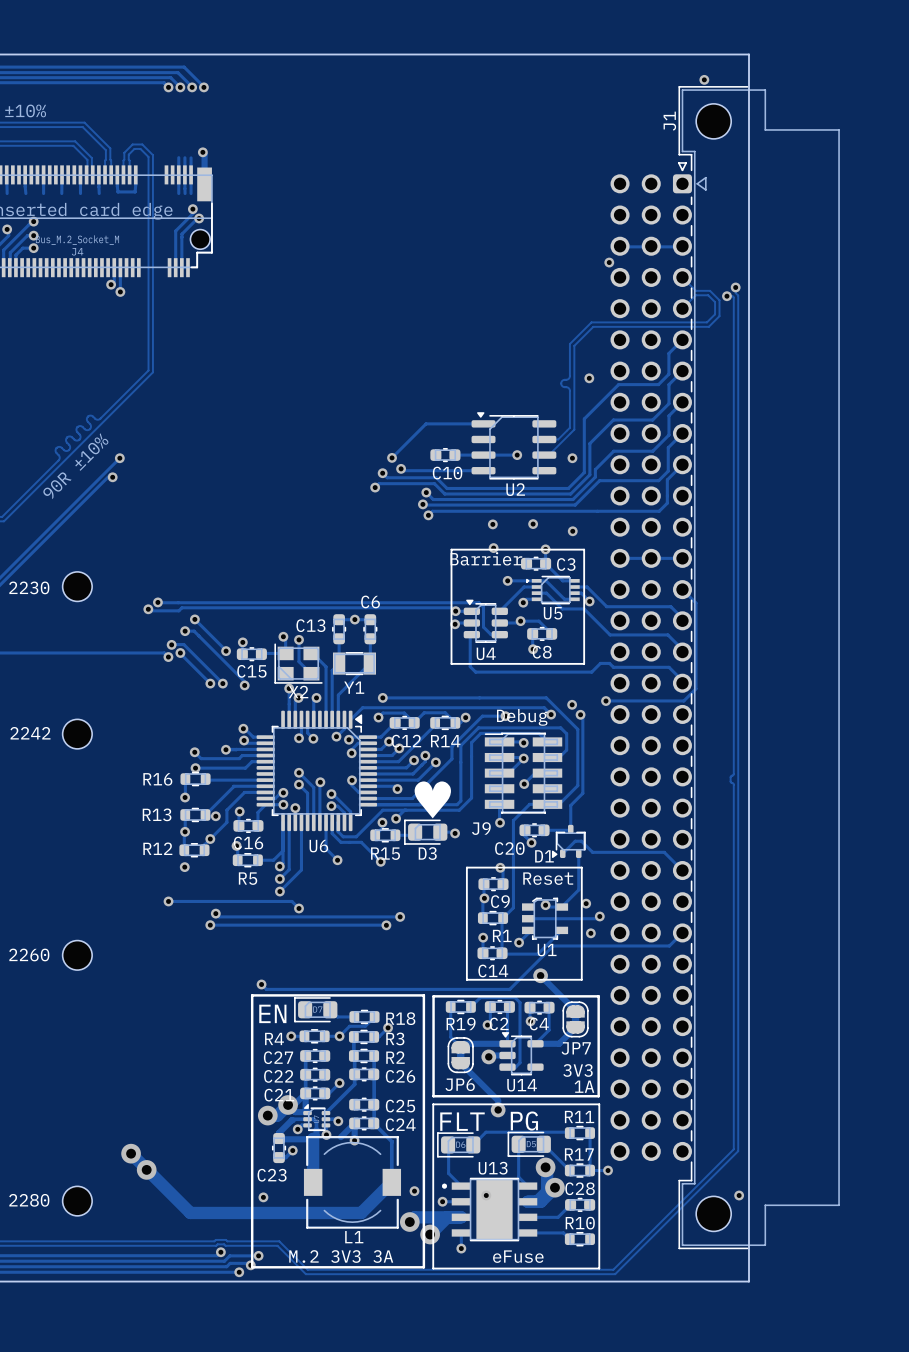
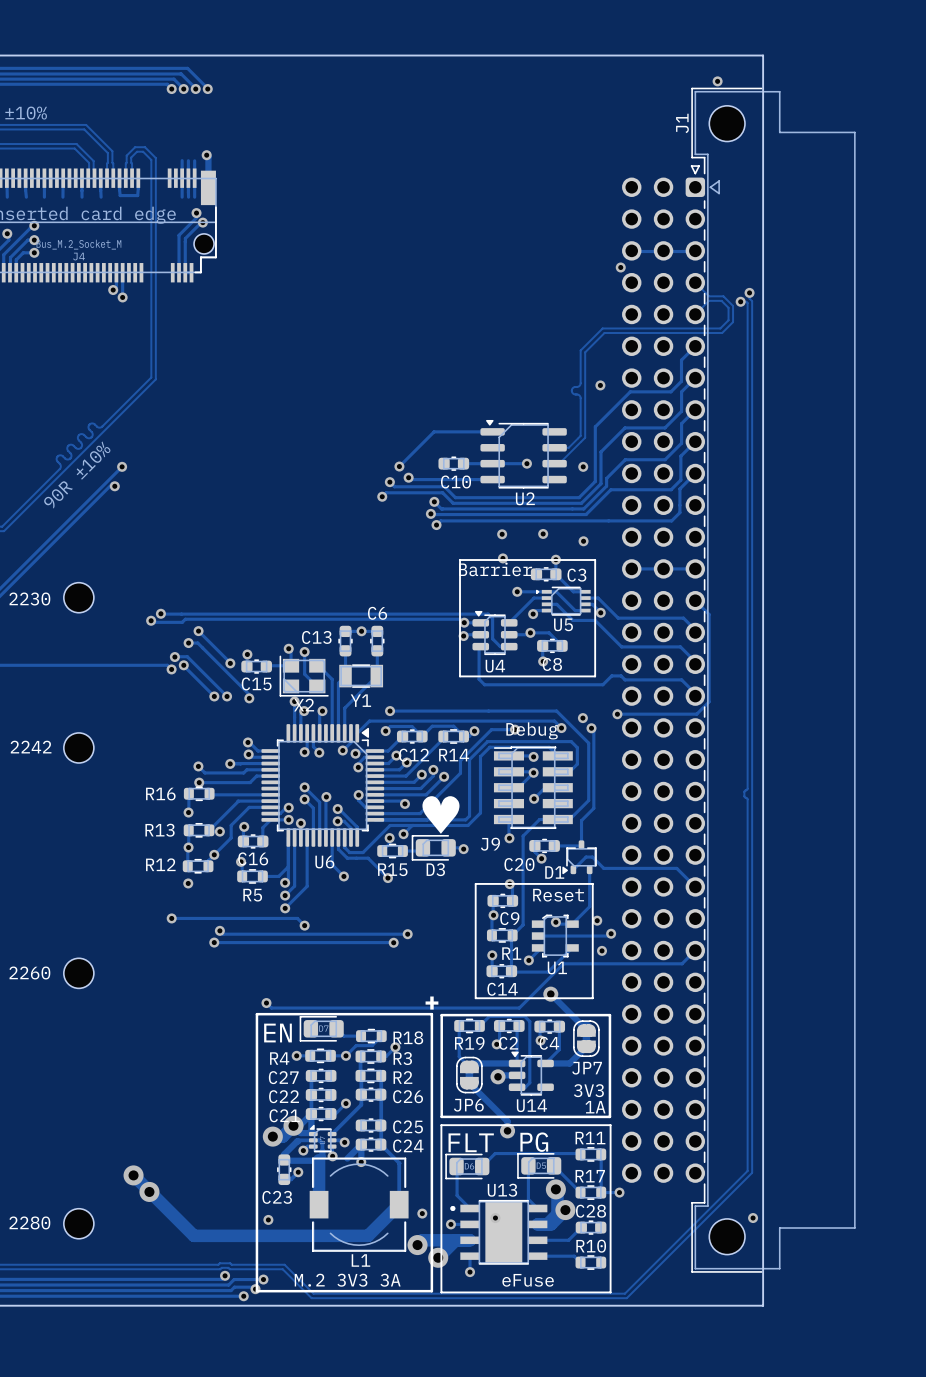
text: none -> + (431, 1003)

